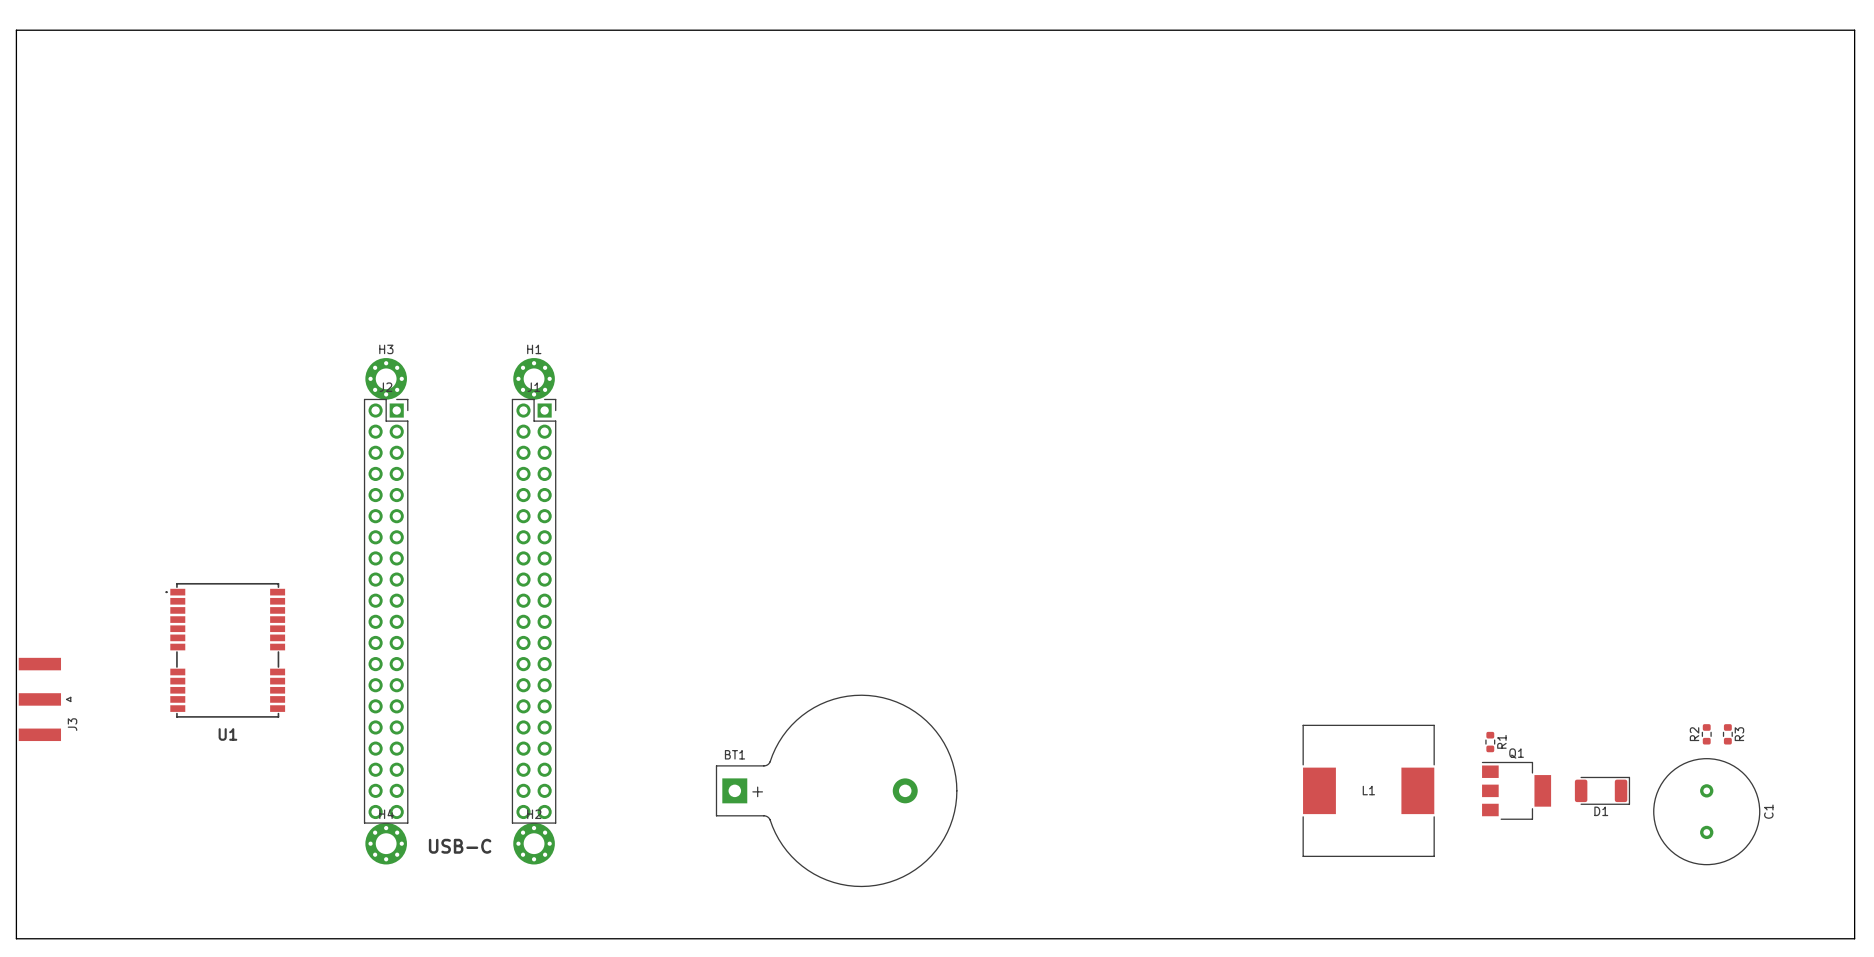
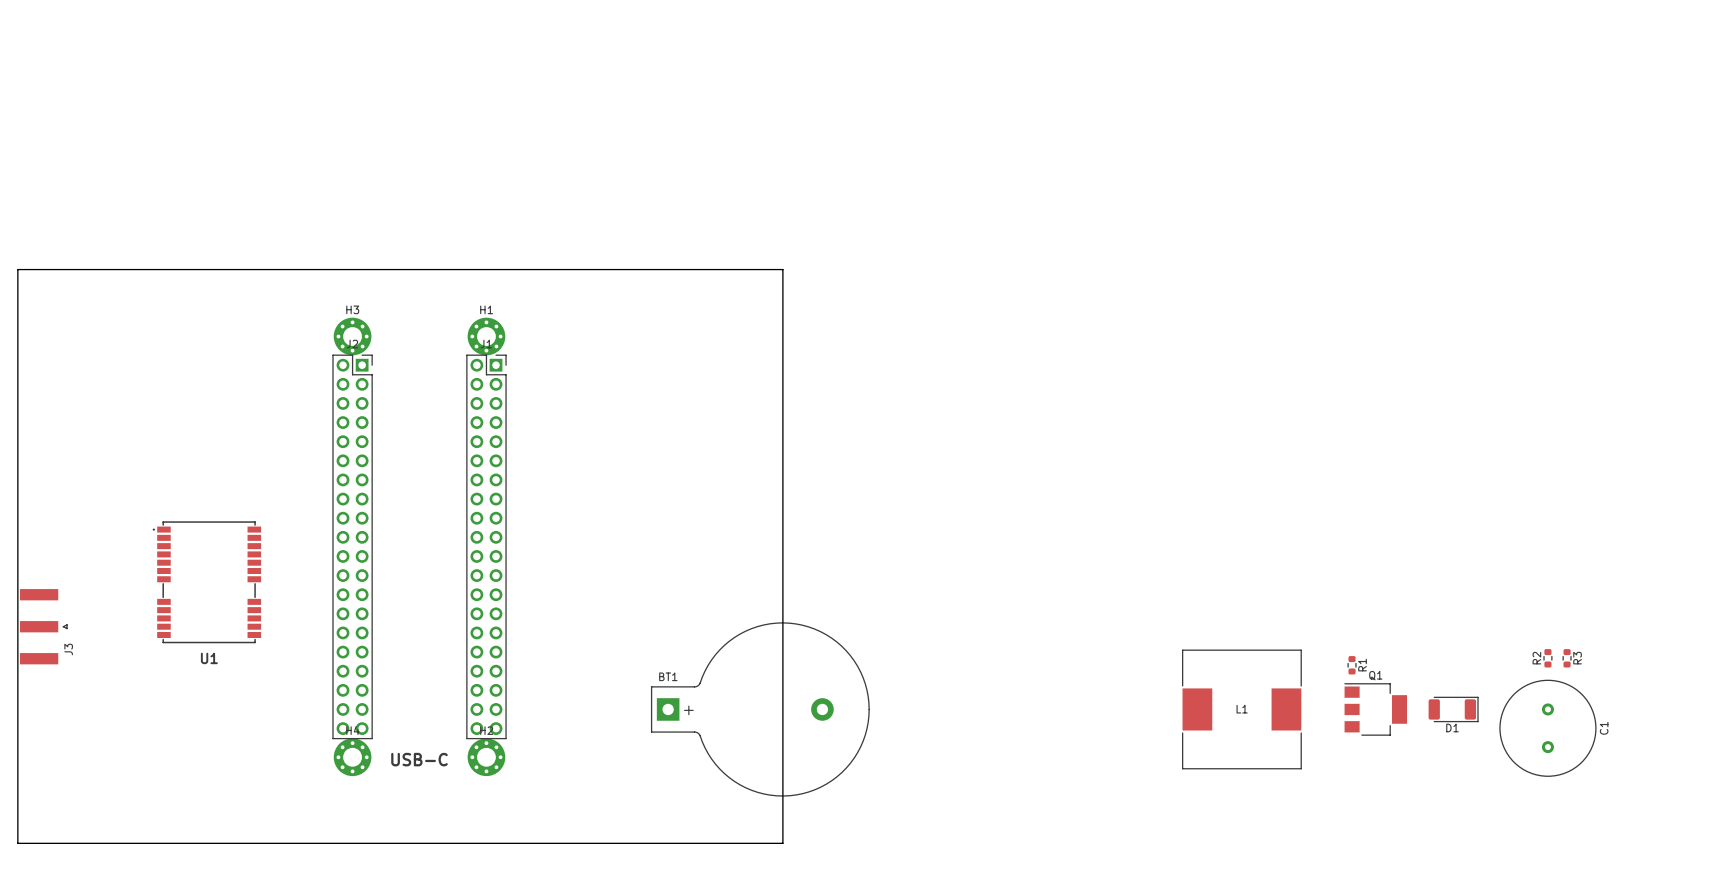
board edge: (16, 304) (16, 30) (1854, 30) (1854, 938) (861, 938) -> (17, 269) (782, 269) (782, 843)

